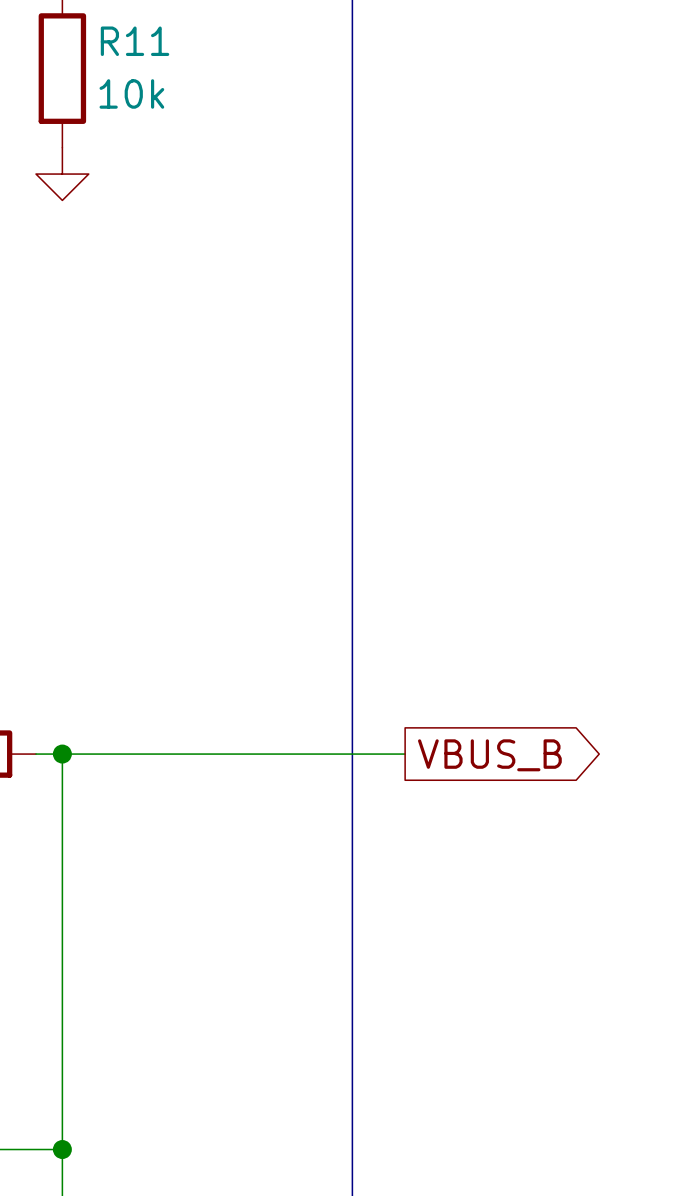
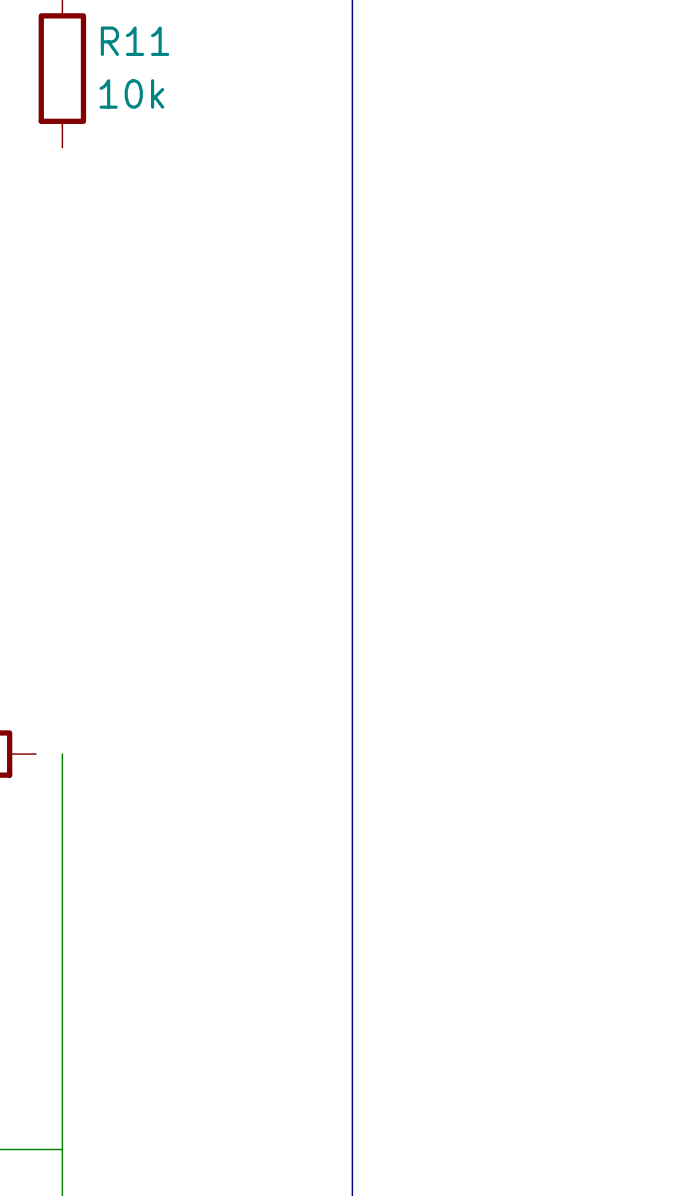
power symbol: (62, 174) -> none
wire: (36, 754) (405, 754) -> none
junction: (62, 754) -> none
global label: VBUS_B (489, 755) -> none
junction: (62, 1149) -> none

